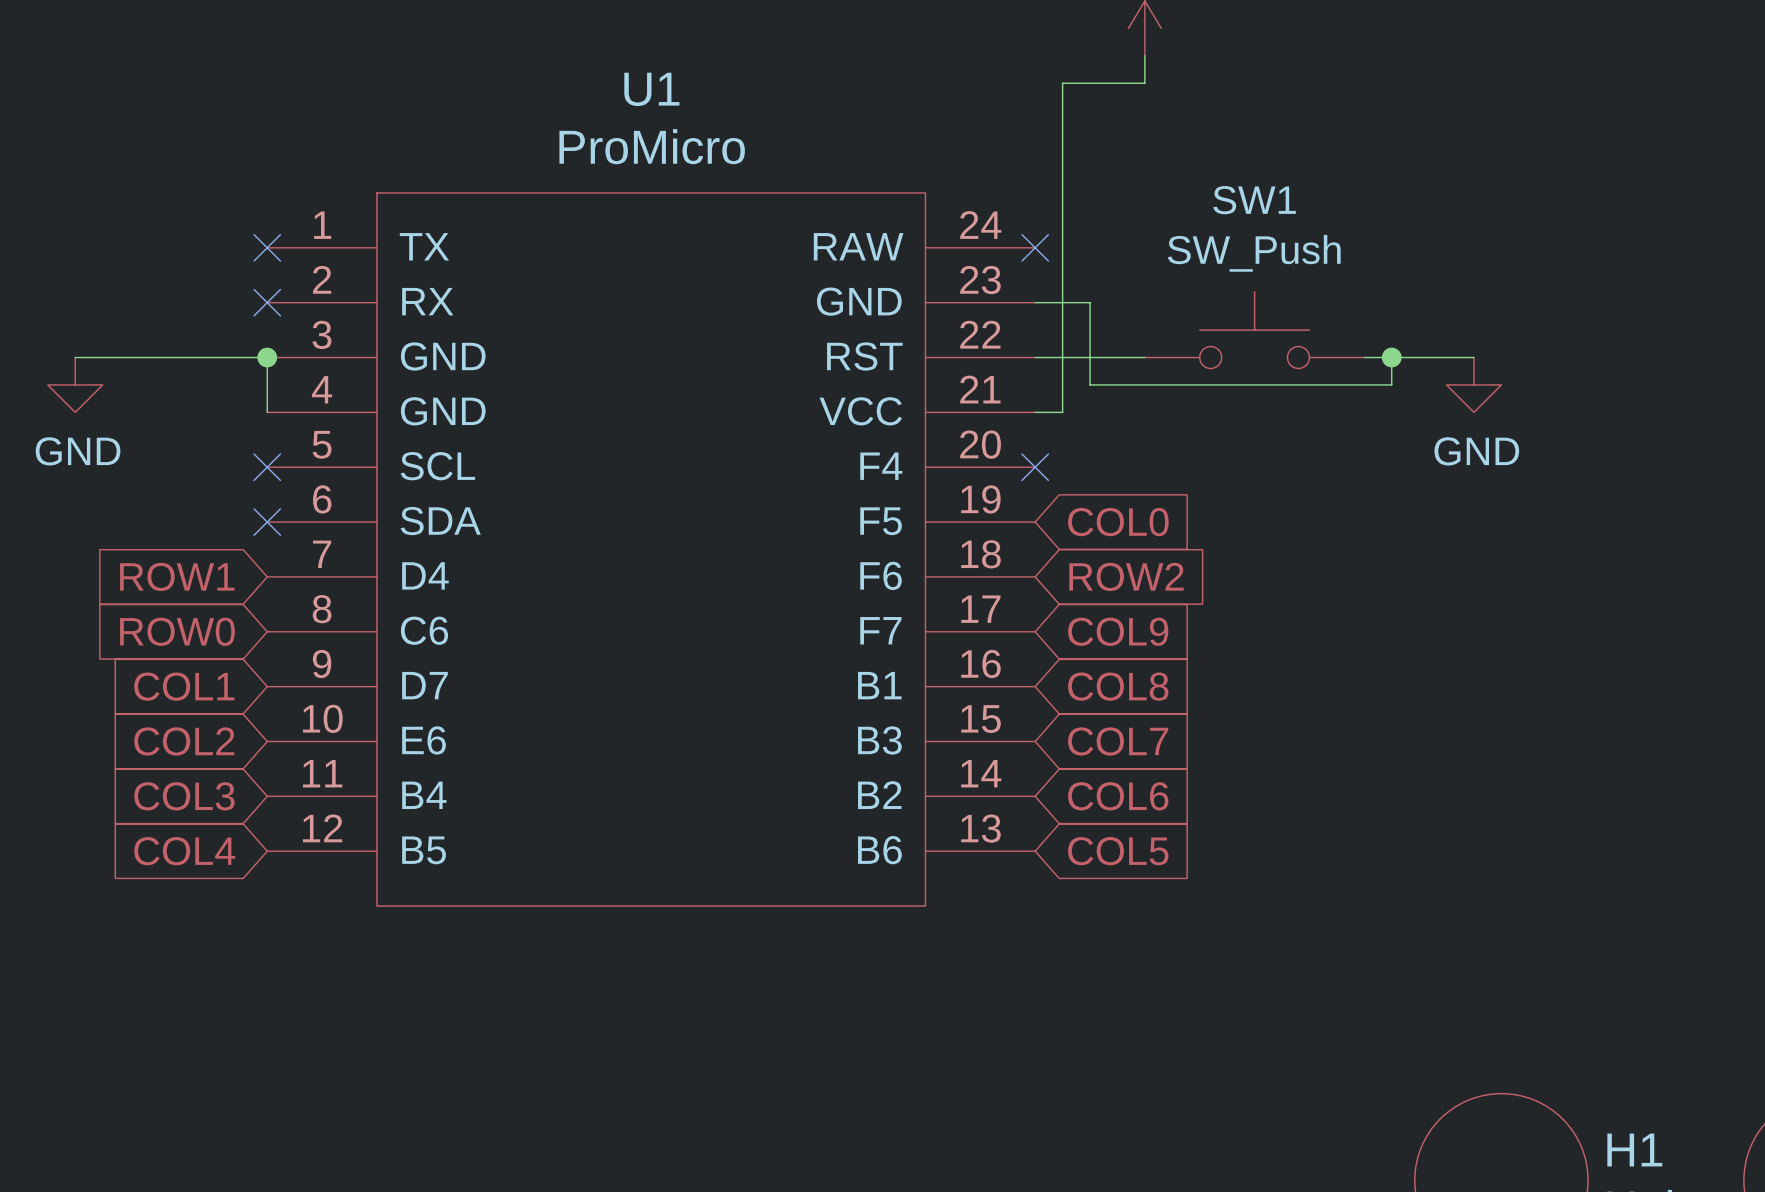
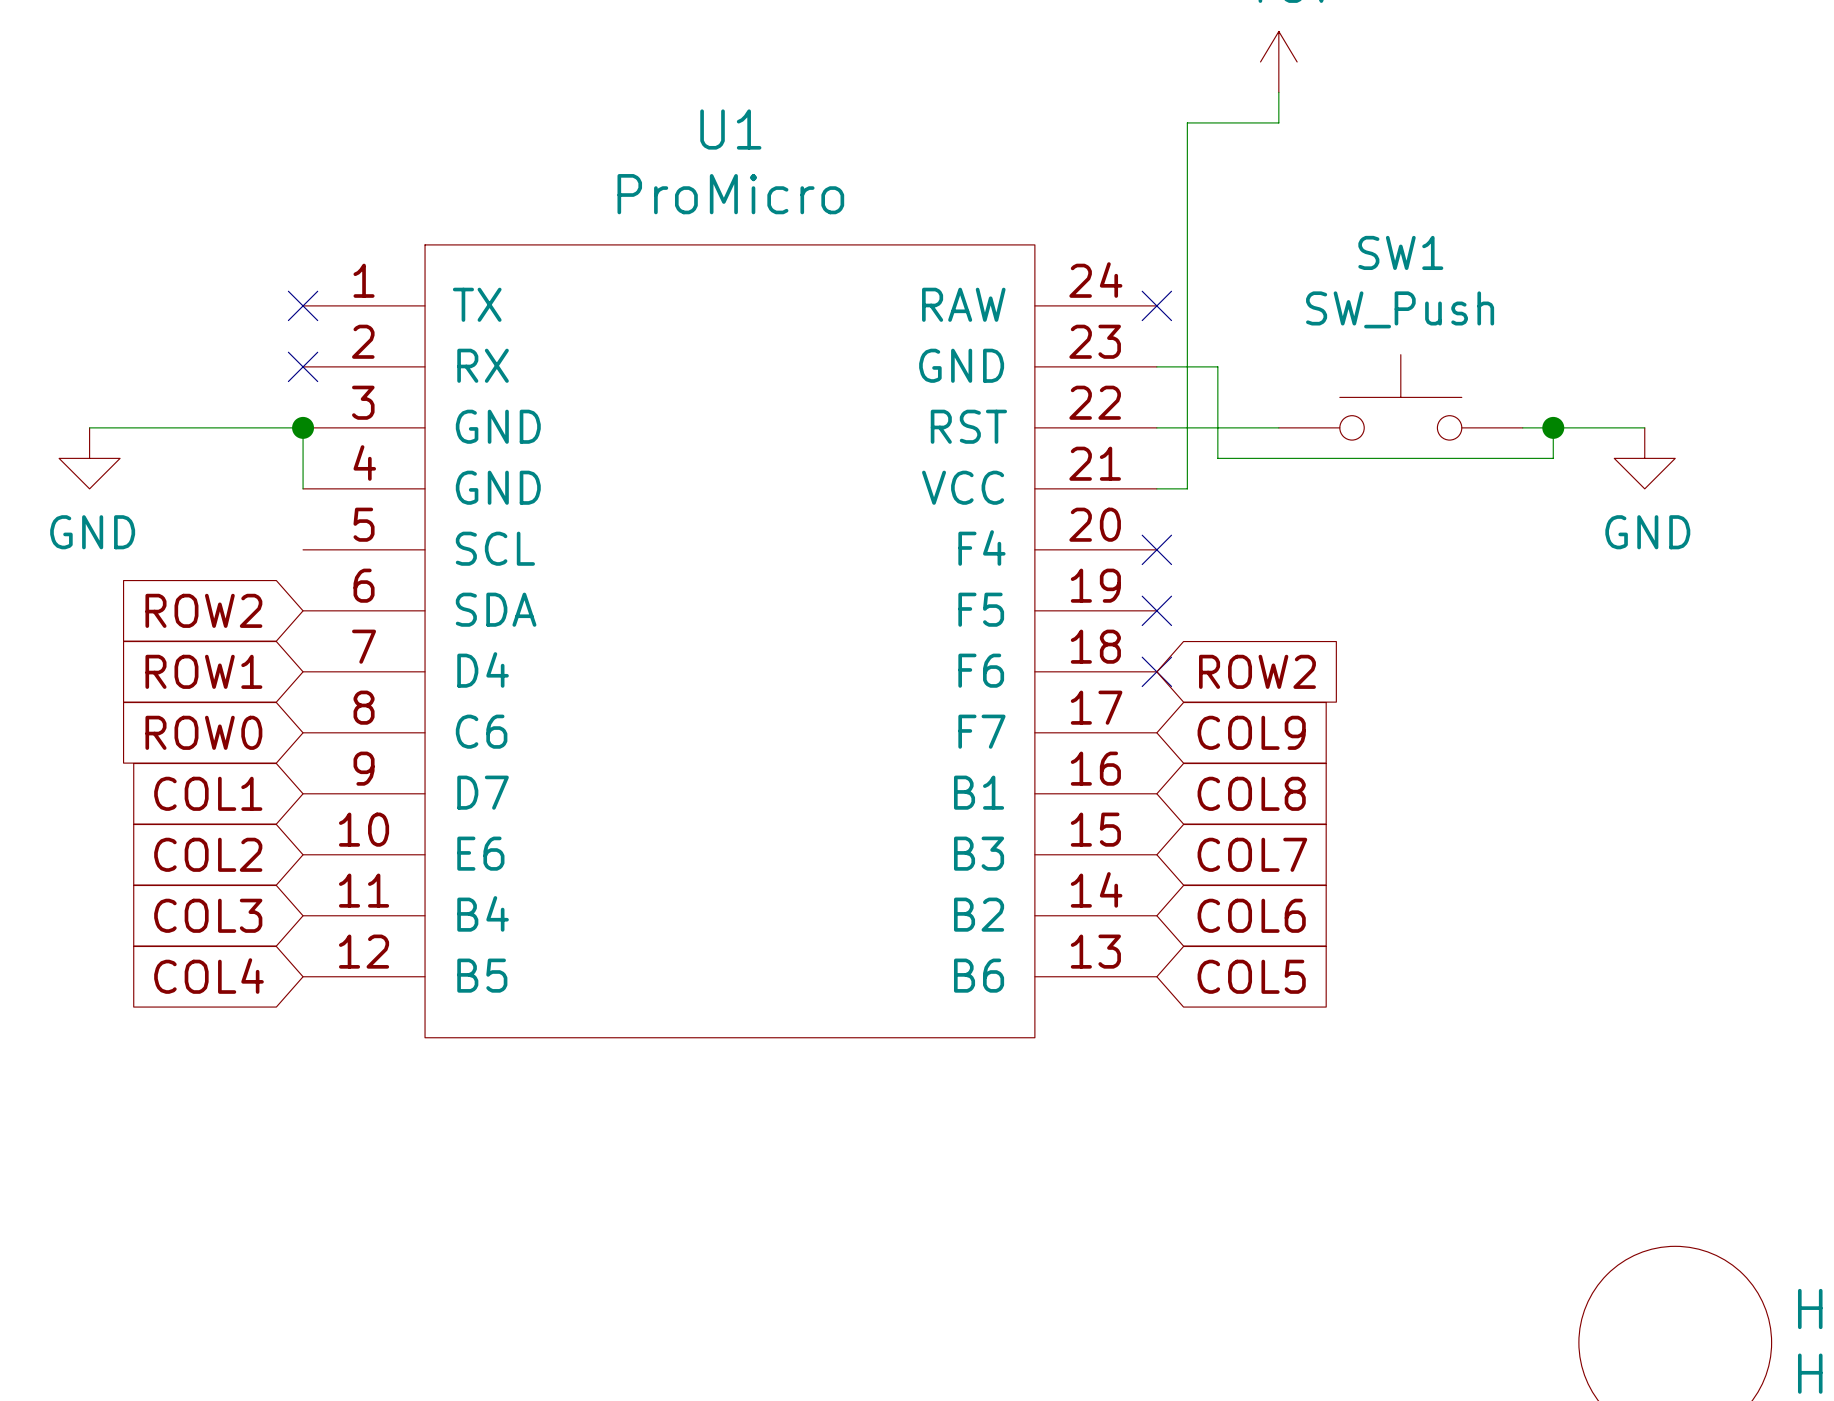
no-connect mark: (267, 467) -> none
global label: none -> ROW2 (203, 610)
no-connect mark: (267, 522) -> none
no-connect mark: none -> (1156, 610)
global label: COL0 (1118, 522) -> none
no-connect mark: none -> (1156, 671)

